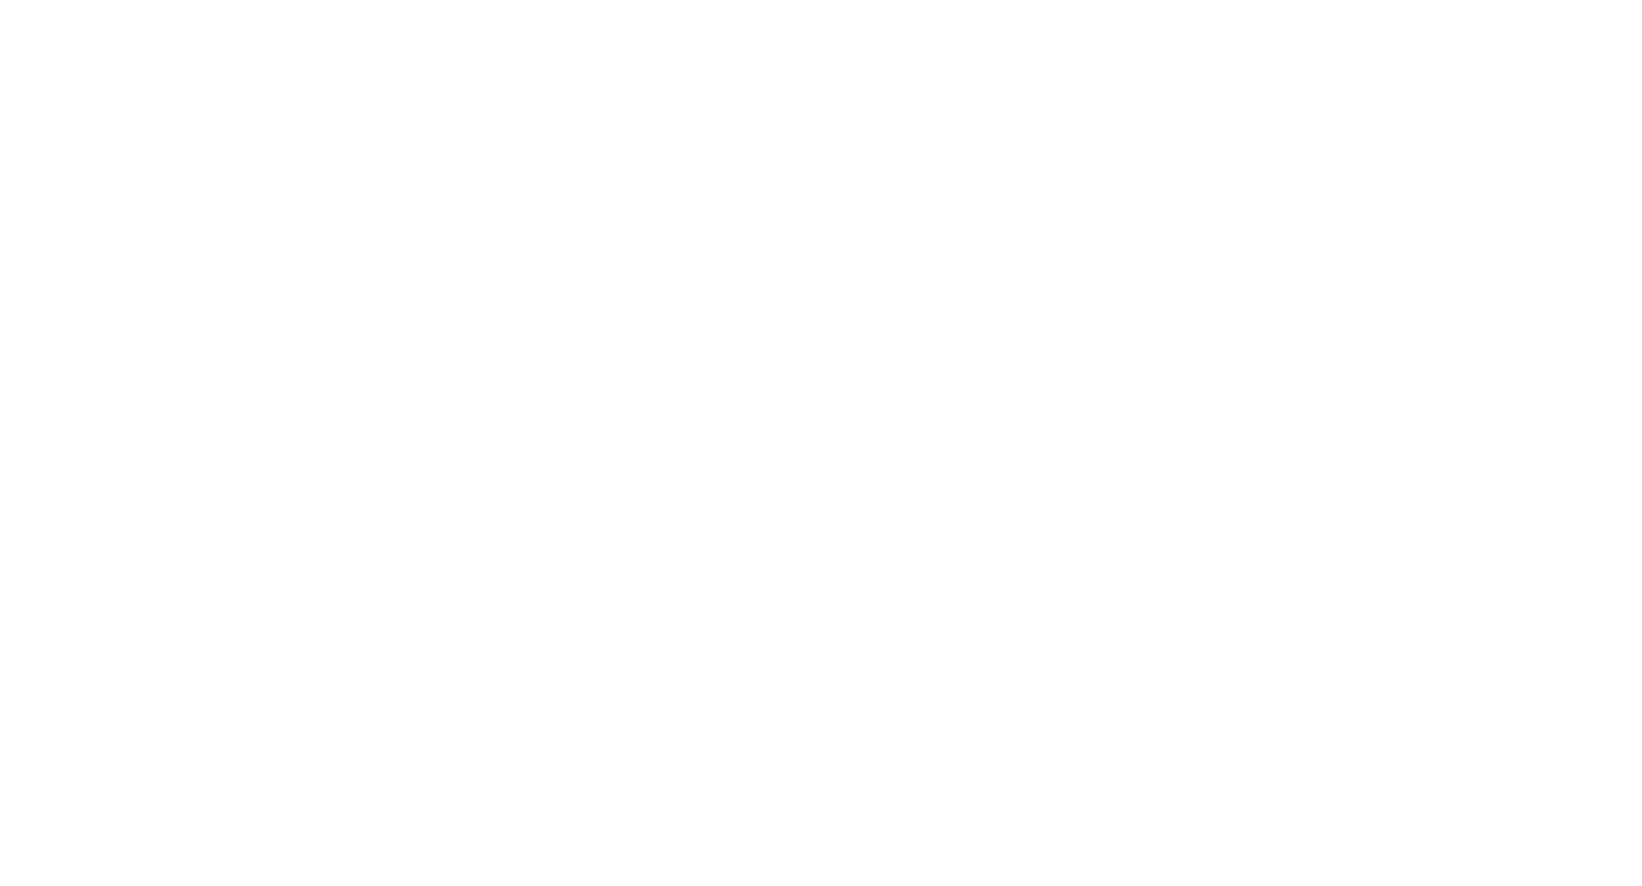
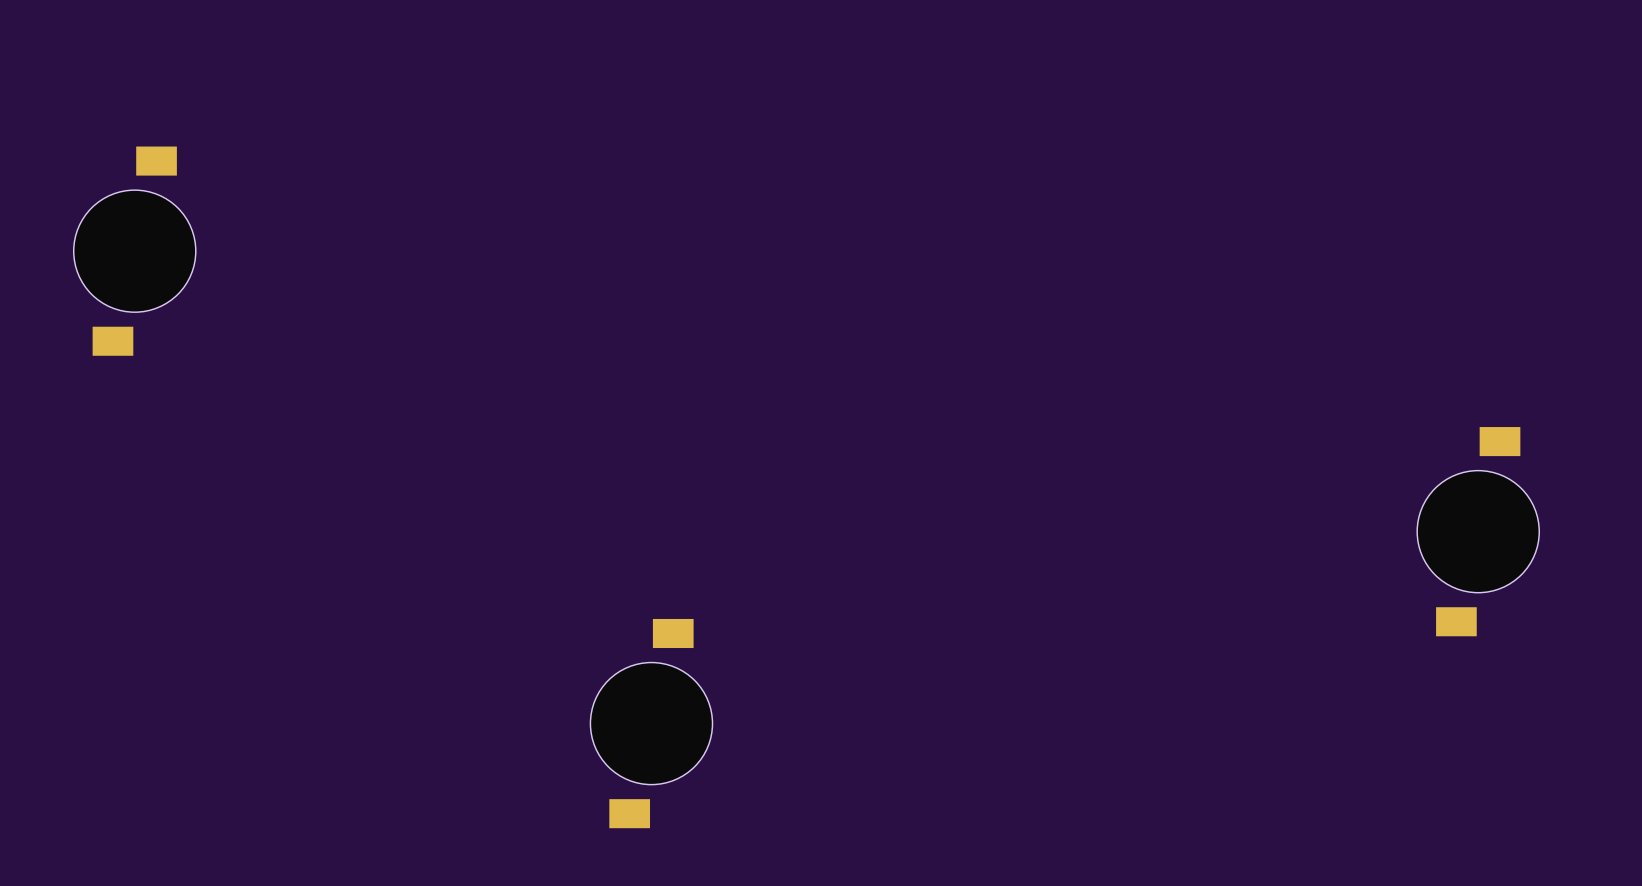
part: none -> (134, 251)
part: none -> (1478, 531)
part: none -> (651, 723)

